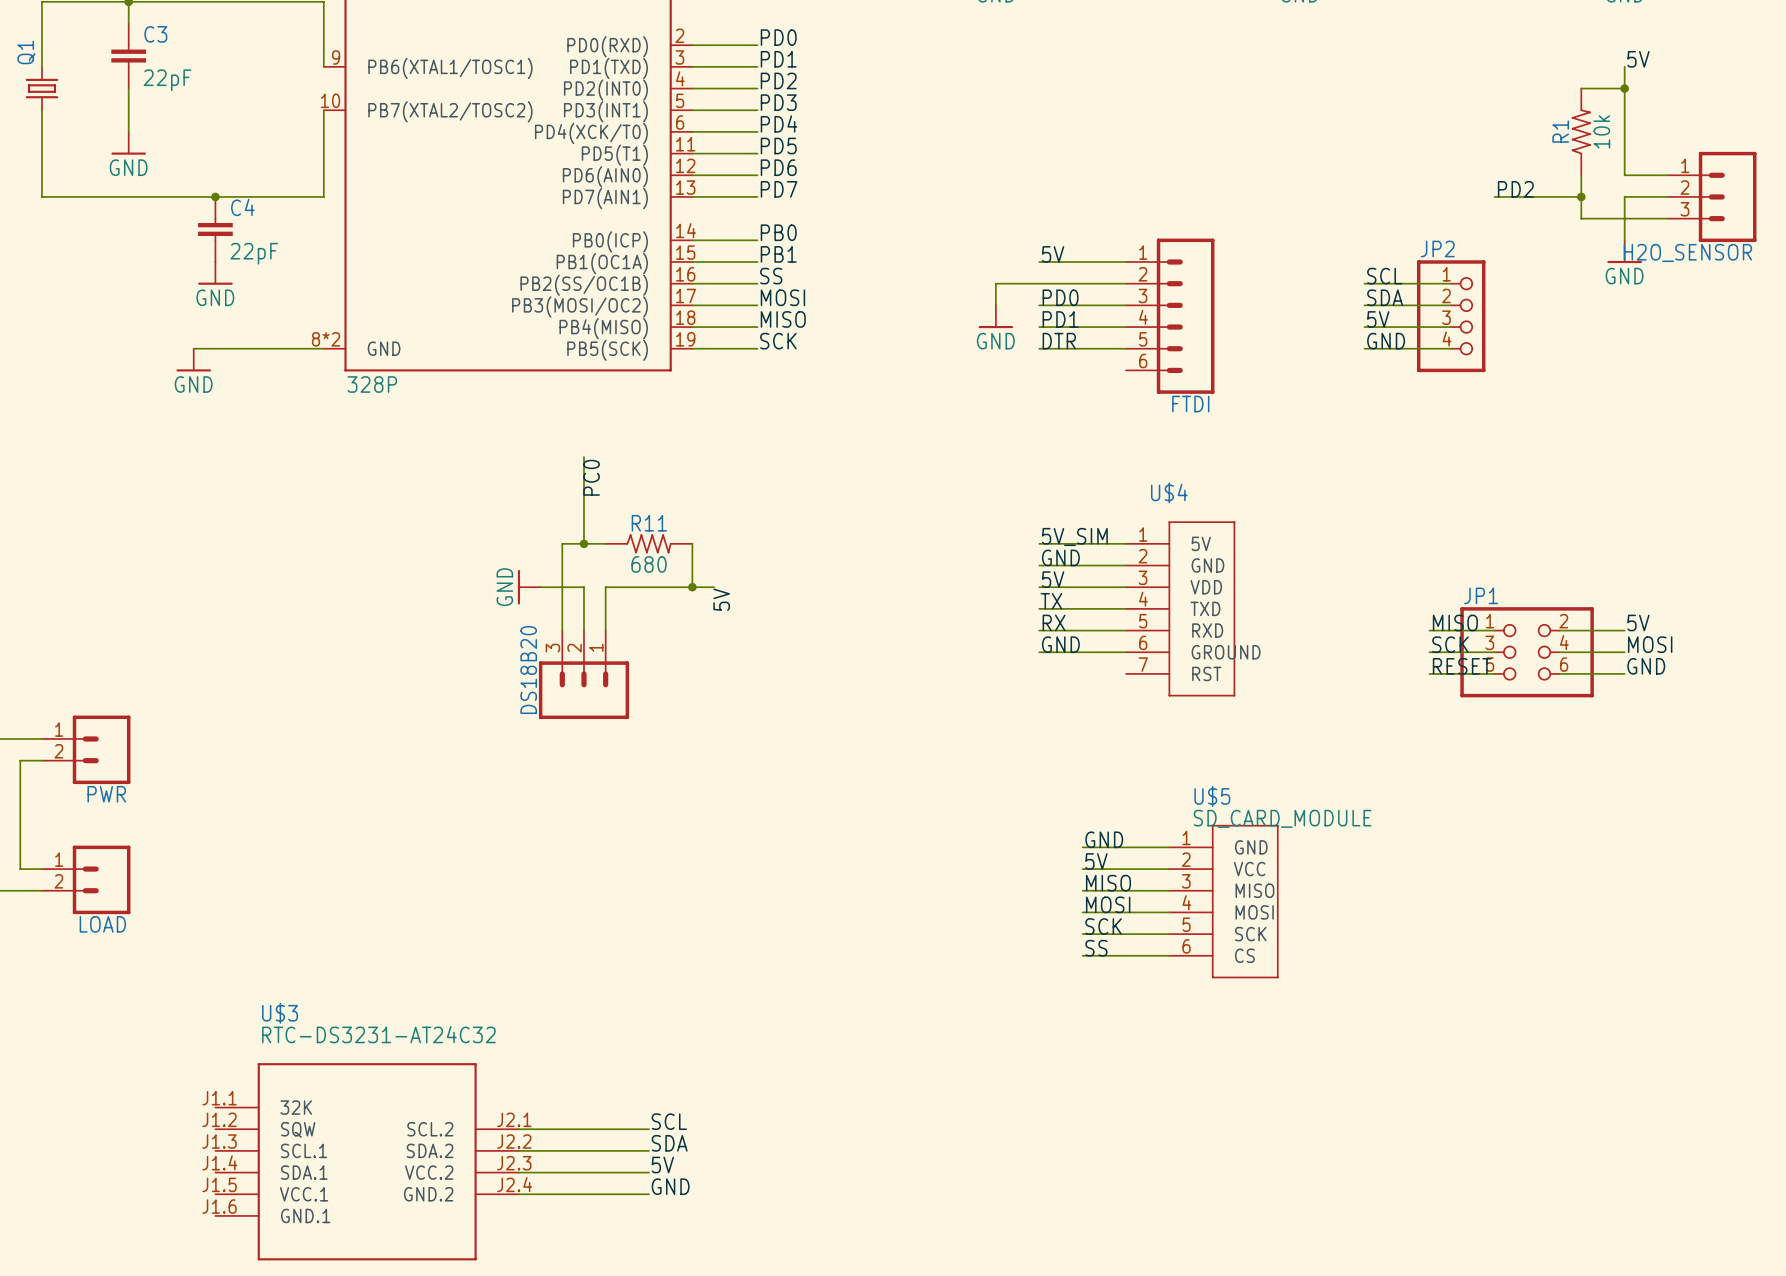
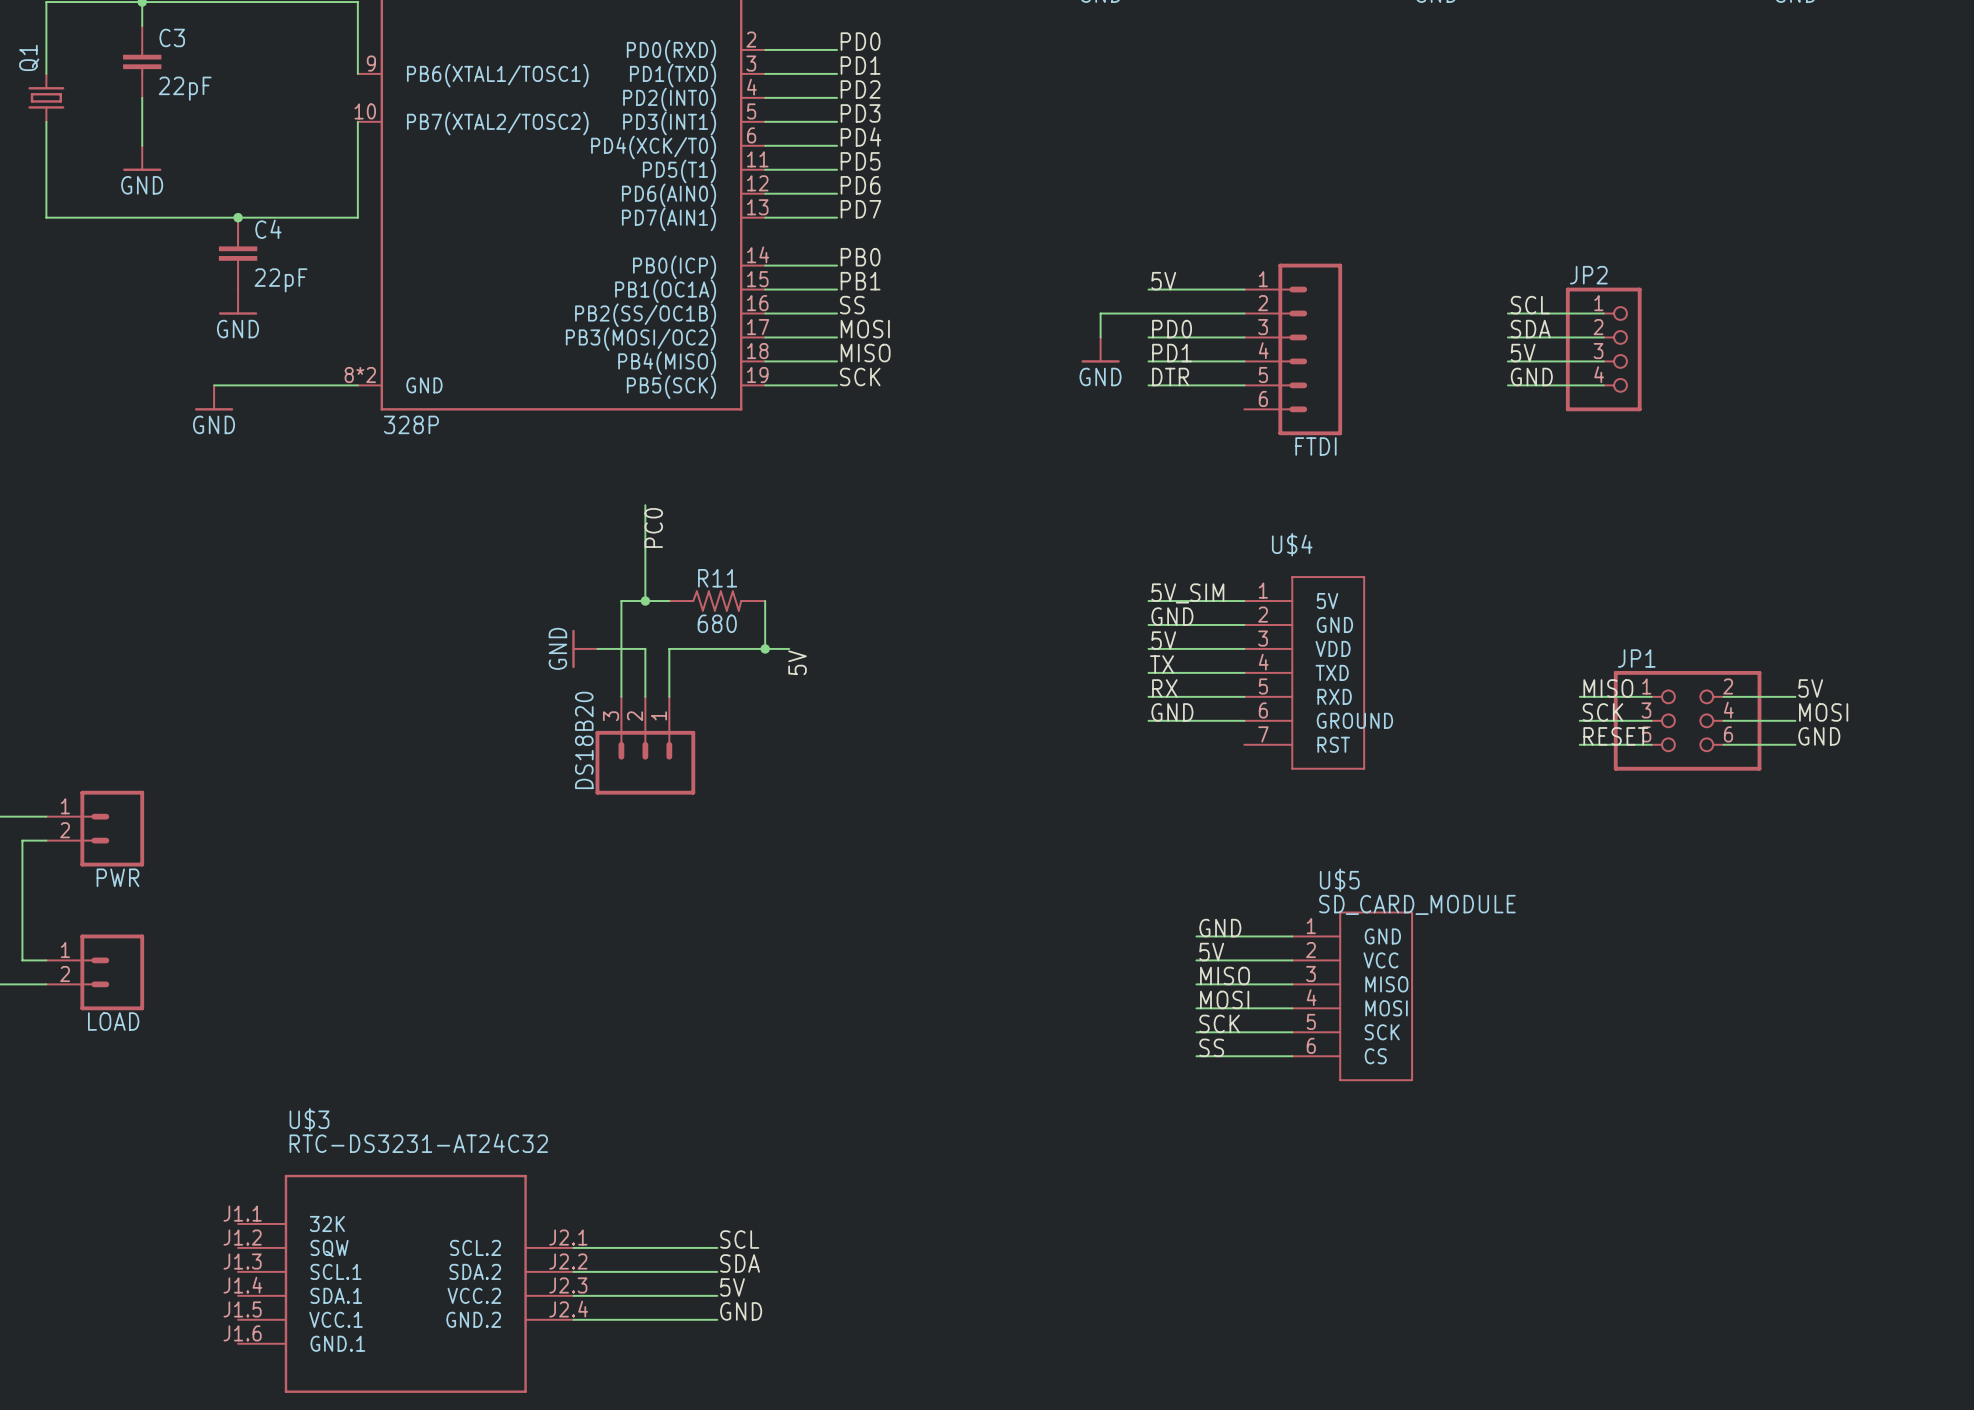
label: 5V (1638, 59) -> none
wire: (1624, 66) (1624, 175) (1668, 175) -> none
wire: (1581, 88) (1624, 88) -> none
junction: (1624, 88) -> none
R1: 10k (1581, 131) -> none
wire: (1581, 175) (1581, 218) (1668, 218) -> none
label: PD2 (1515, 189) -> none
wire: (1494, 196) (1581, 196) -> none
junction: (1581, 196) -> none
wire: (1668, 196) (1624, 196) (1624, 240) -> none
H2O_SENSOR: (1712, 196) -> none
power symbol: GND (1624, 251) -> none

